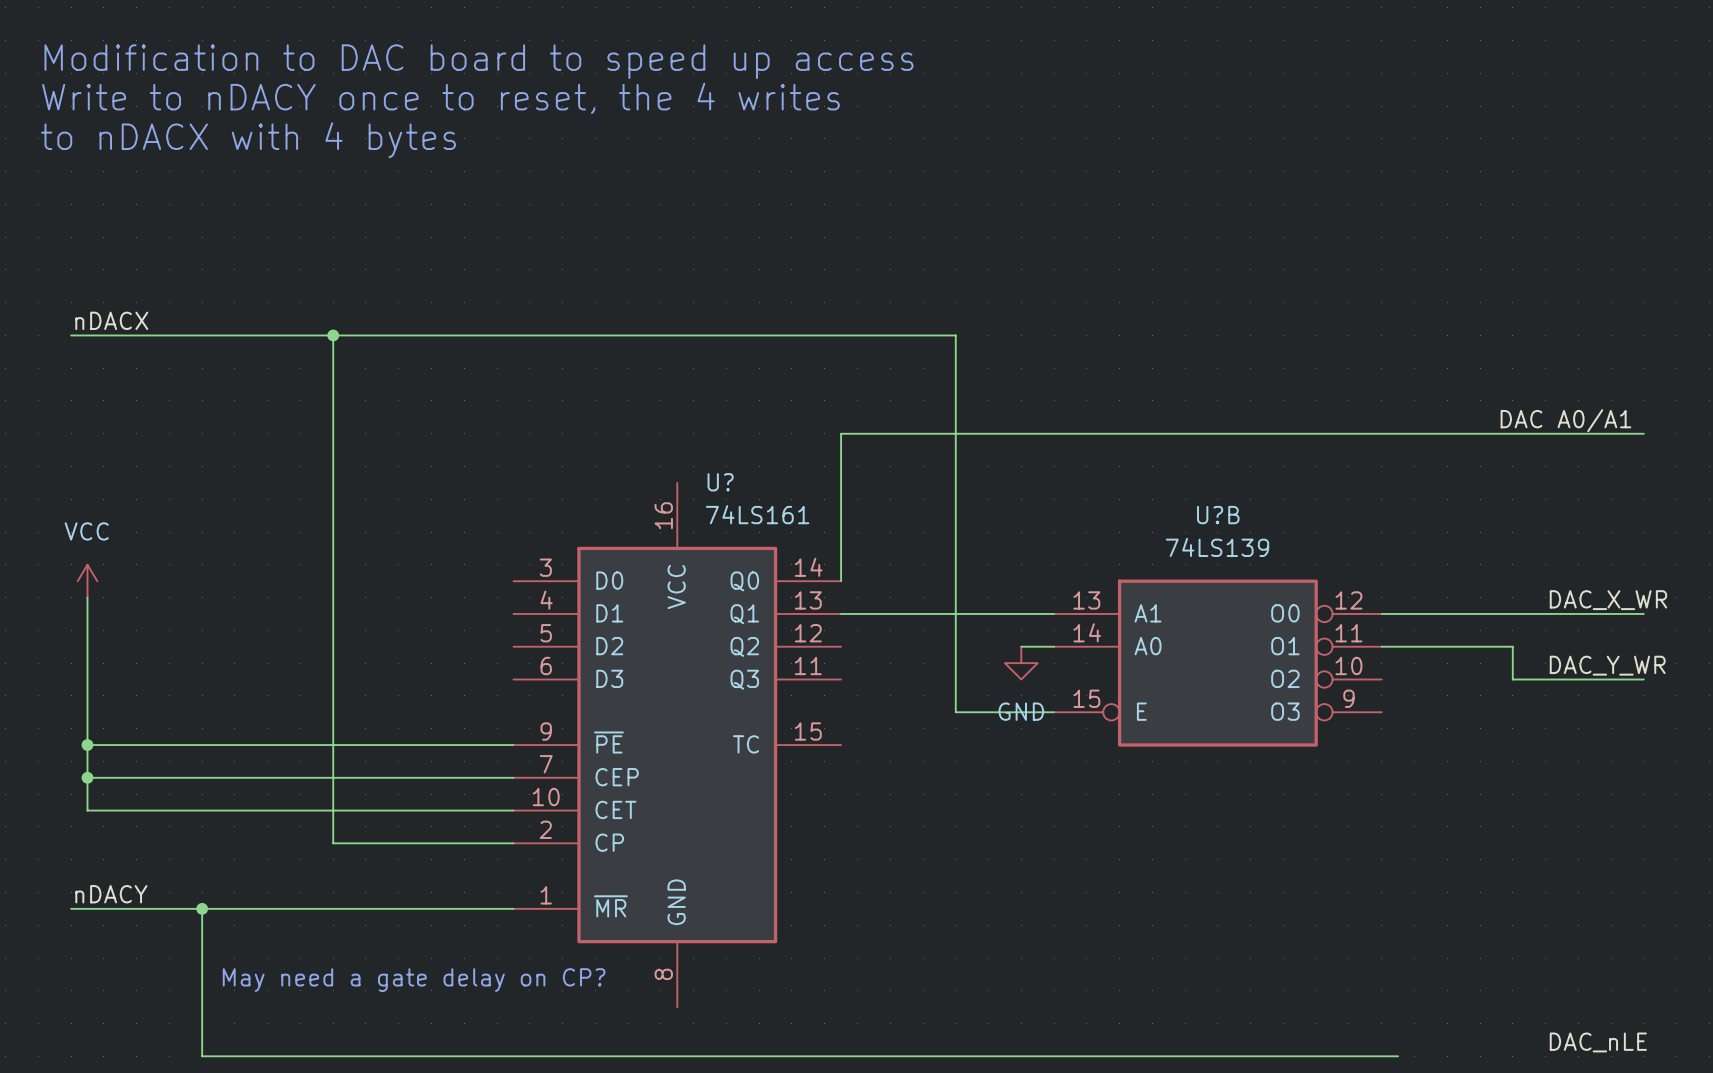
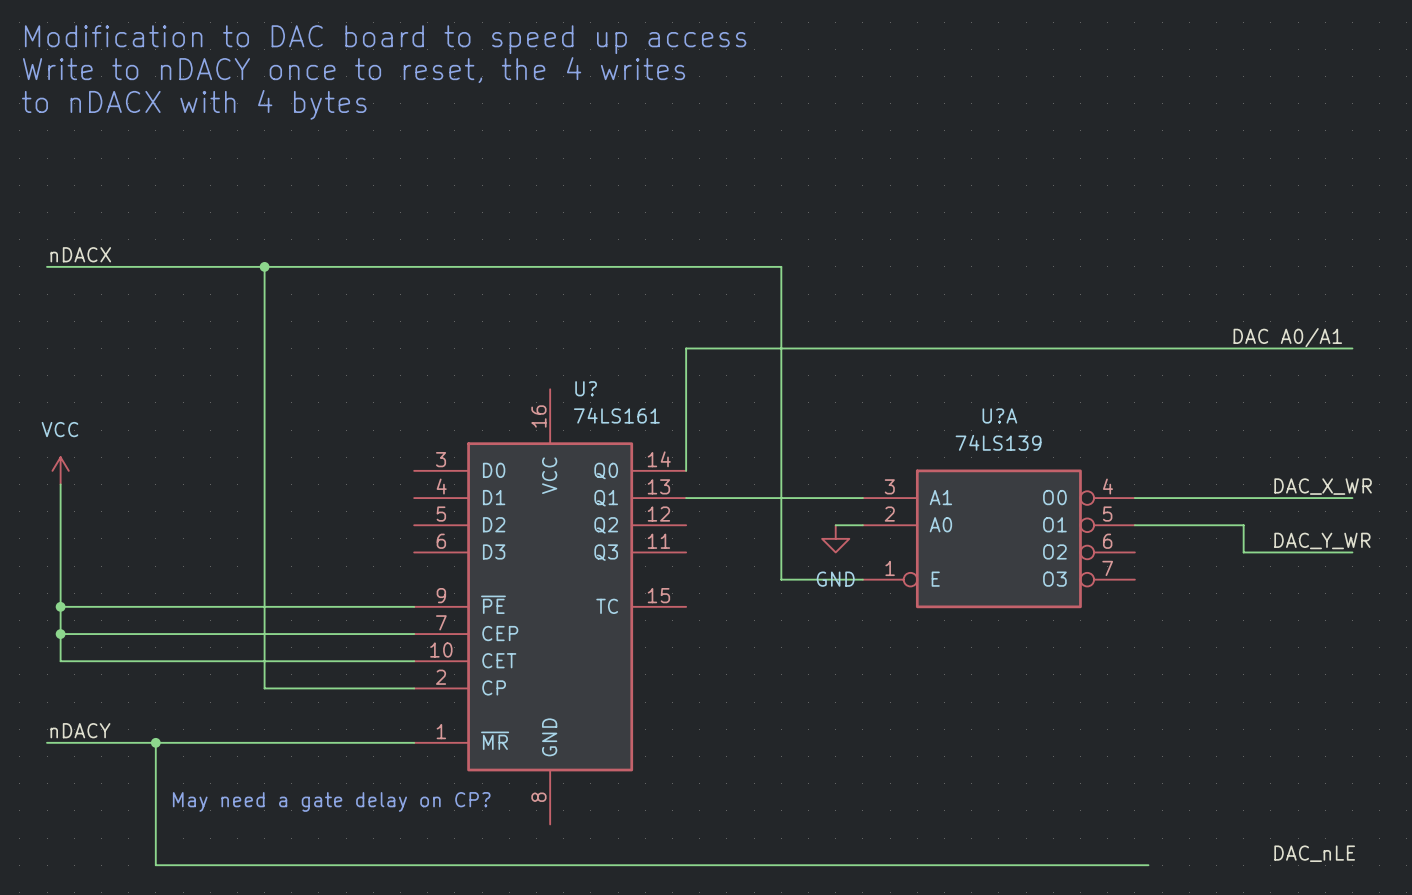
U?B name: U?B (1218, 515) -> U?A (999, 415)
U?B pin number: 13 (1086, 600) -> 3 (889, 486)
U?B pin number: 12 (1348, 600) -> 4 (1108, 486)
U?B pin number: 14 (1087, 632) -> 2 (889, 514)
U?B pin number: 11 (1348, 633) -> 5 (1107, 514)
U?B pin number: 10 (1348, 665) -> 6 (1107, 541)
U?B pin number: 15 (1086, 698) -> 1 (890, 568)
U?B pin number: 9 (1348, 698) -> 7 (1107, 568)

